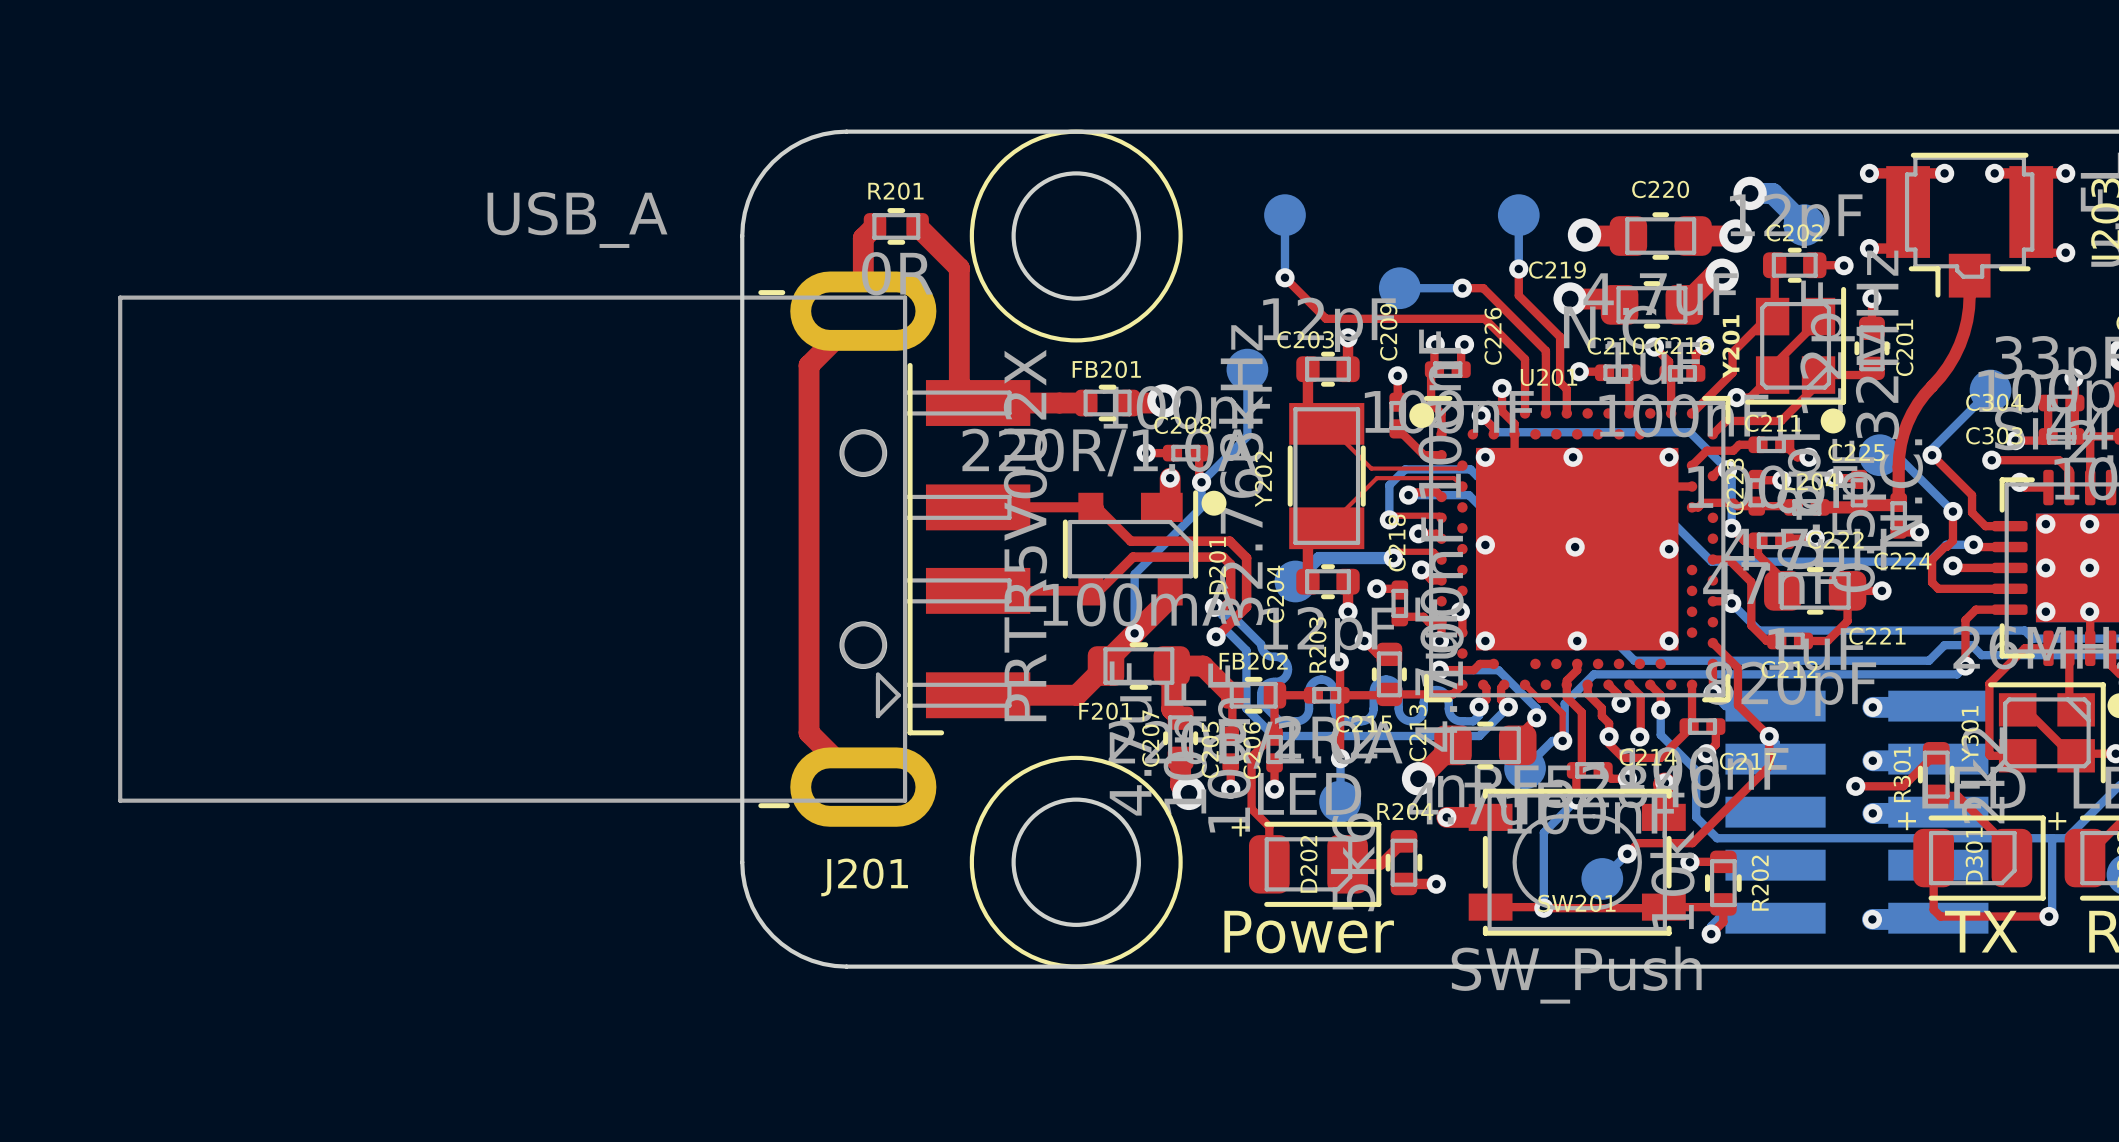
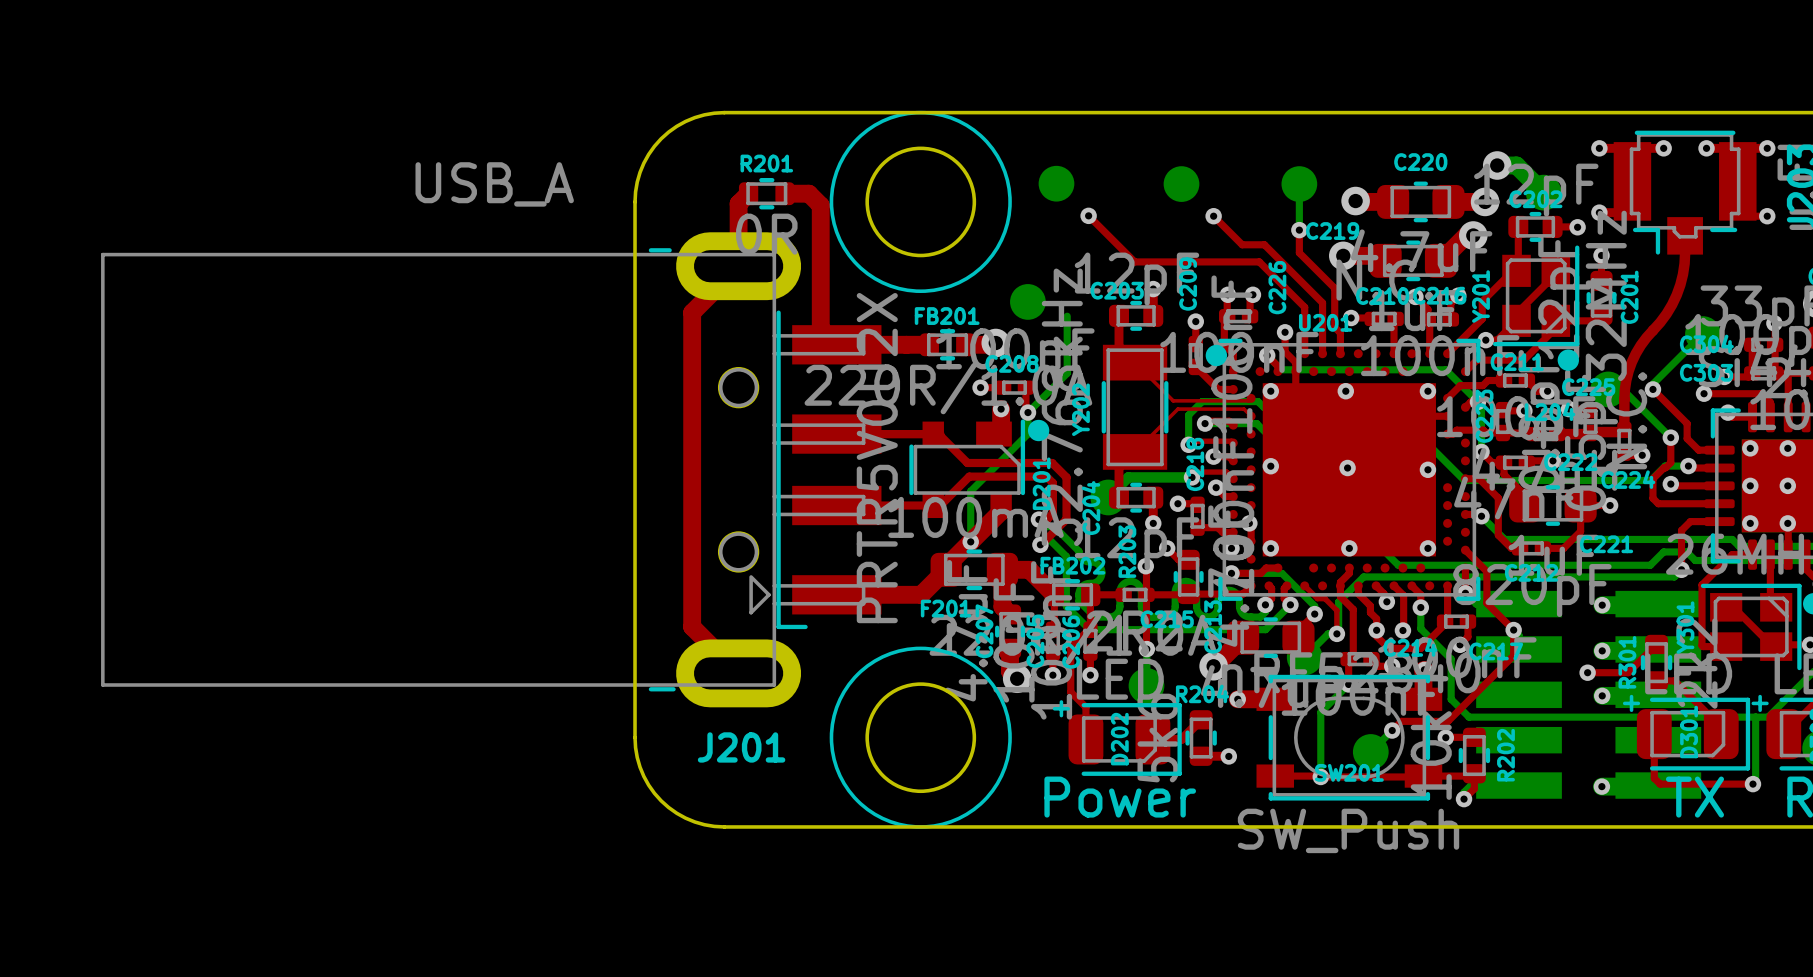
part: none -> (1056, 183)
bottom track: (1284, 215) (1284, 277) -> none
part: (1284, 215) -> none
part: none -> (1181, 184)
top track: (917, 226) (959, 268) -> (785, 193) (808, 193) (820, 205) (820, 229)
top track: (1284, 277) (1326, 318) (1484, 318) -> (1088, 215) (1134, 261) (1259, 261) (1270, 272)
via position: (1284, 277) -> (1088, 215)
bottom track: (1399, 288) (1462, 288) -> none
part: (1399, 288) -> none
top track: (1462, 288) (1483, 288) (1545, 350) (1545, 354) -> (1213, 216) (1242, 244) (1264, 244) (1322, 302)
via position: (1462, 288) -> (1213, 216)
part position: (1247, 369) -> (1027, 301)

